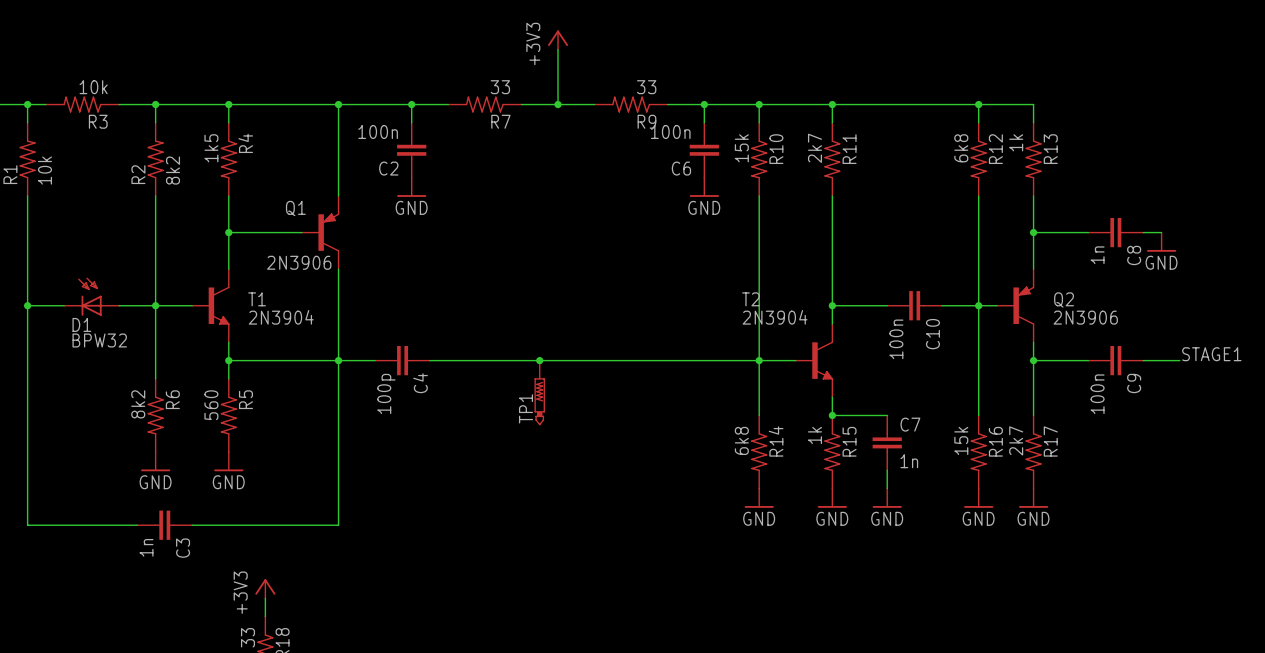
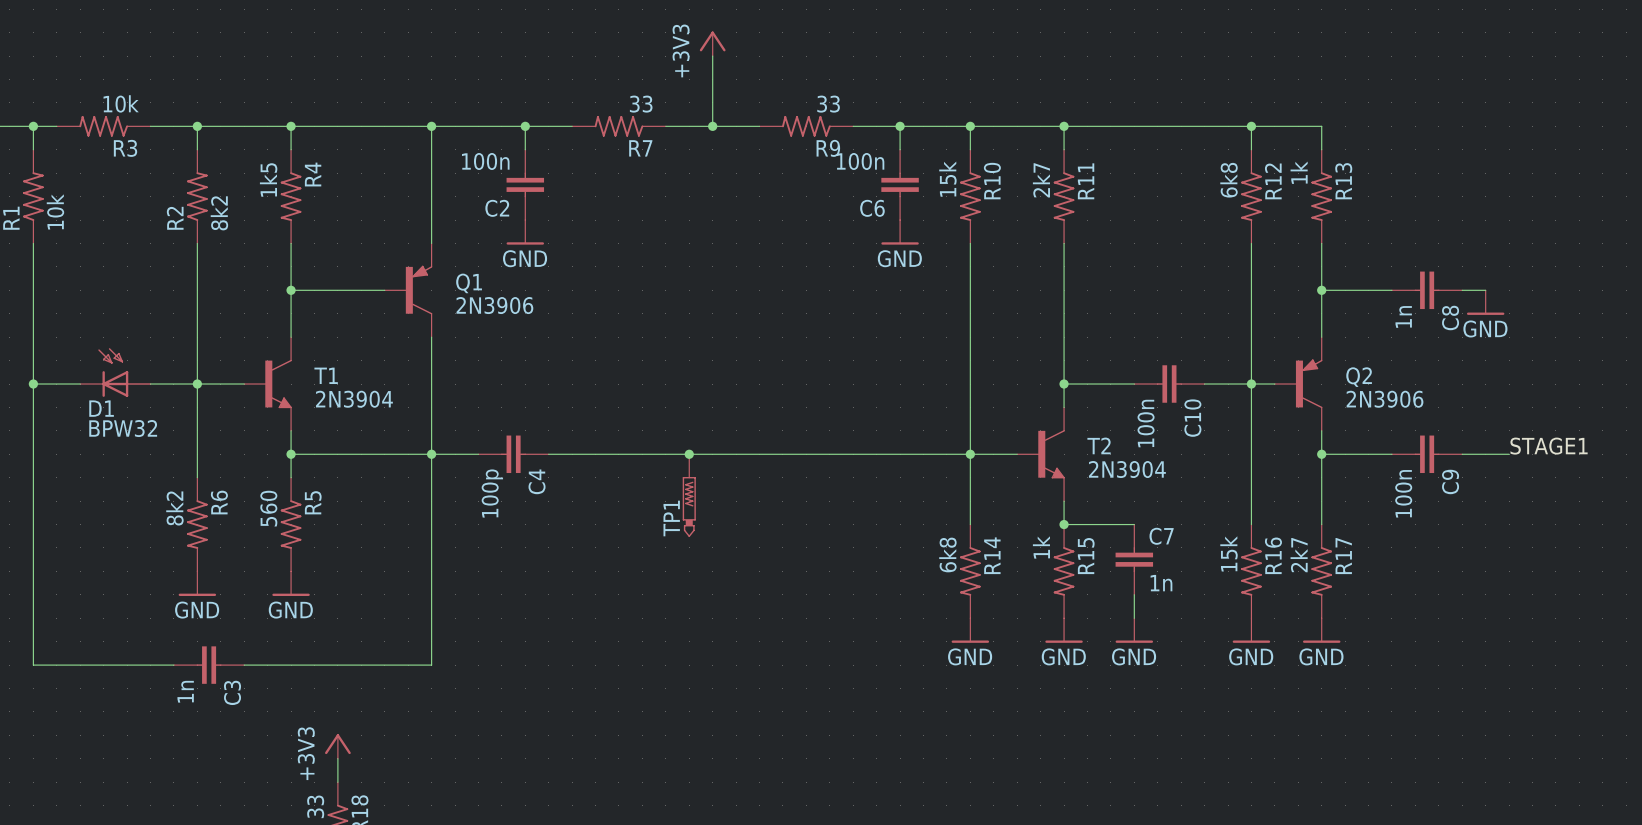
Q1 name position: Q1 (295, 208) -> Q1 (469, 283)
Q1 value position: 2N3906 (299, 262) -> 2N3906 (494, 305)
T2 name position: T2 (750, 299) -> T2 (1099, 445)
T2 value position: 2N3904 (775, 317) -> 2N3904 (1127, 469)

